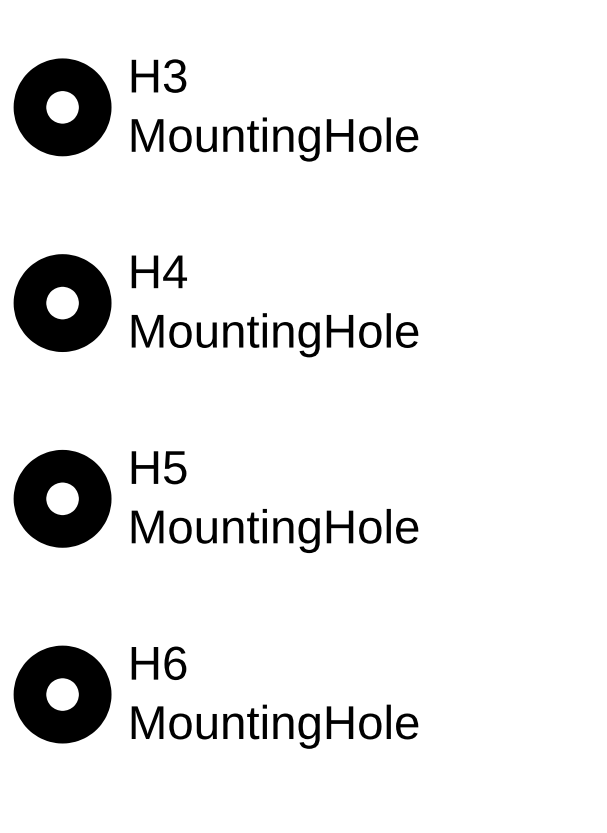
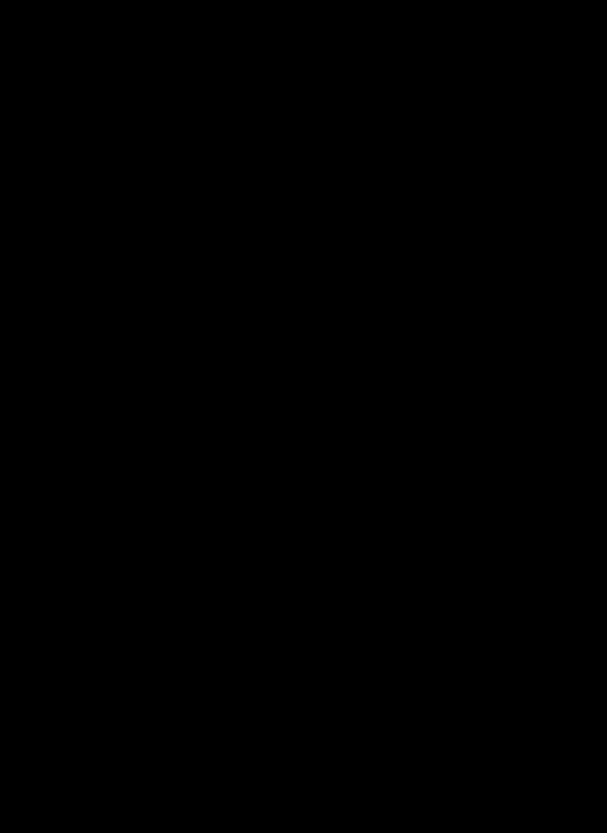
H3: MountingHole (62, 107) -> none
H4: MountingHole (62, 303) -> none
H5: MountingHole (62, 498) -> none
H6: MountingHole (62, 694) -> none

